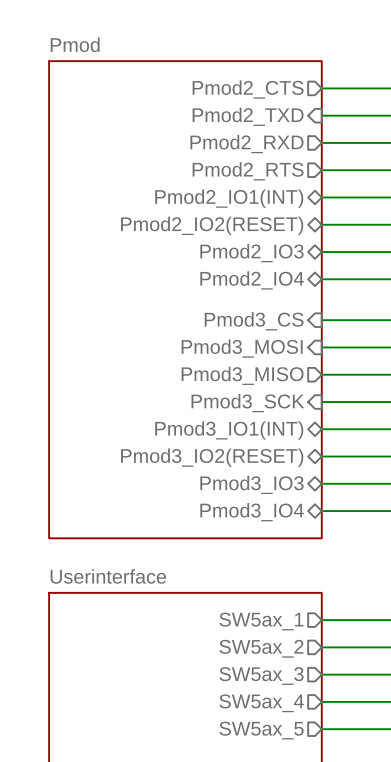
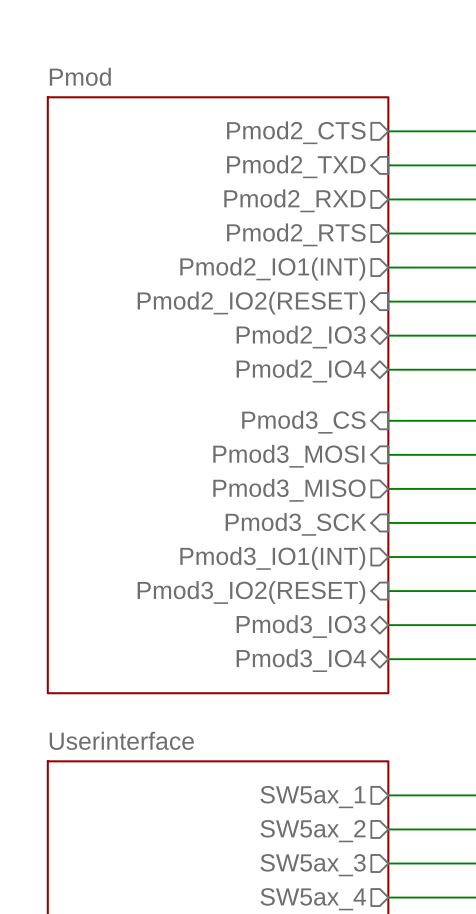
sheet pin shape: bidirectional (229, 198) -> output (272, 269)
sheet pin shape: bidirectional (212, 225) -> input (251, 303)
sheet pin shape: bidirectional (229, 430) -> output (272, 558)
sheet pin shape: bidirectional (212, 457) -> input (251, 592)

